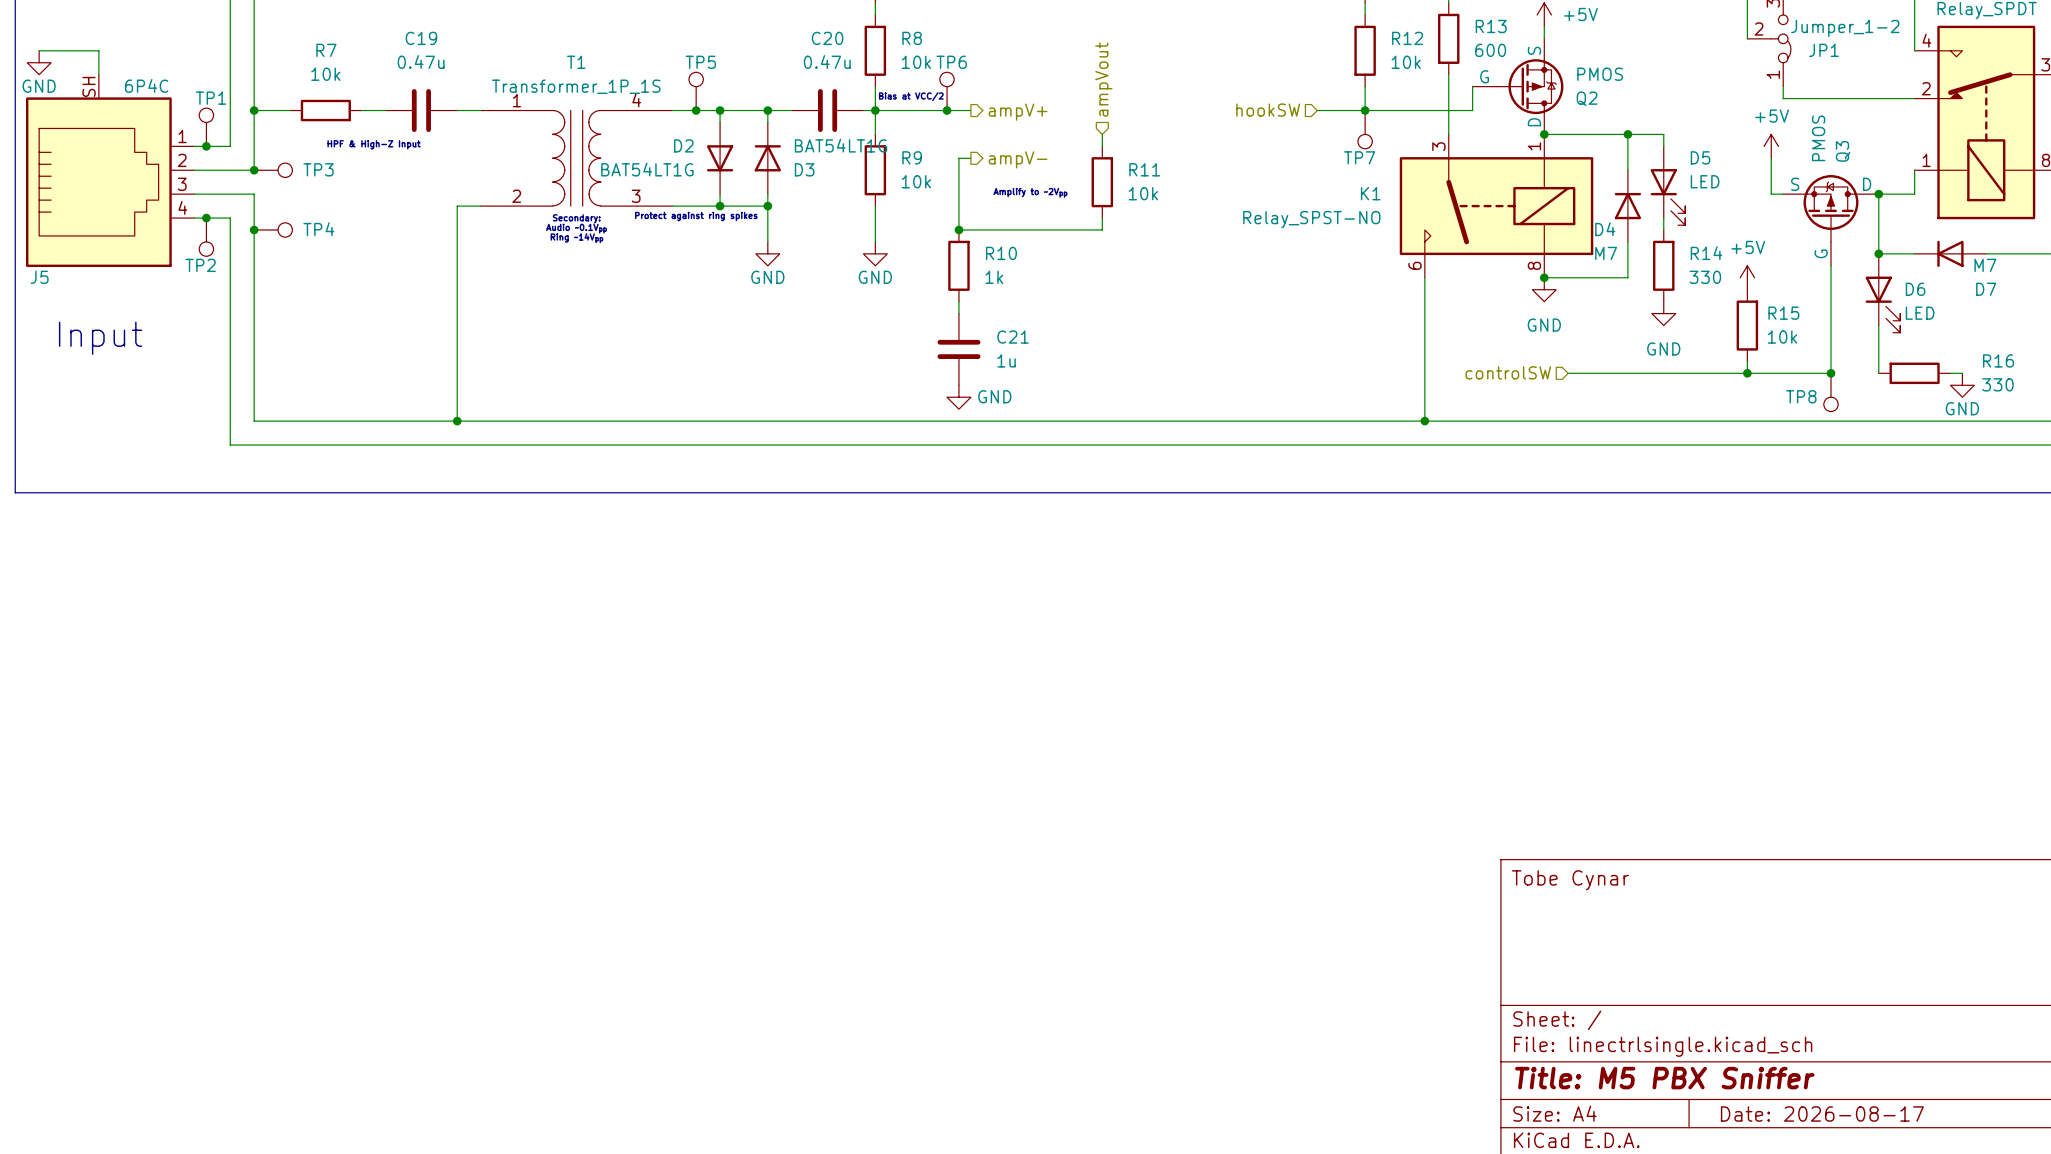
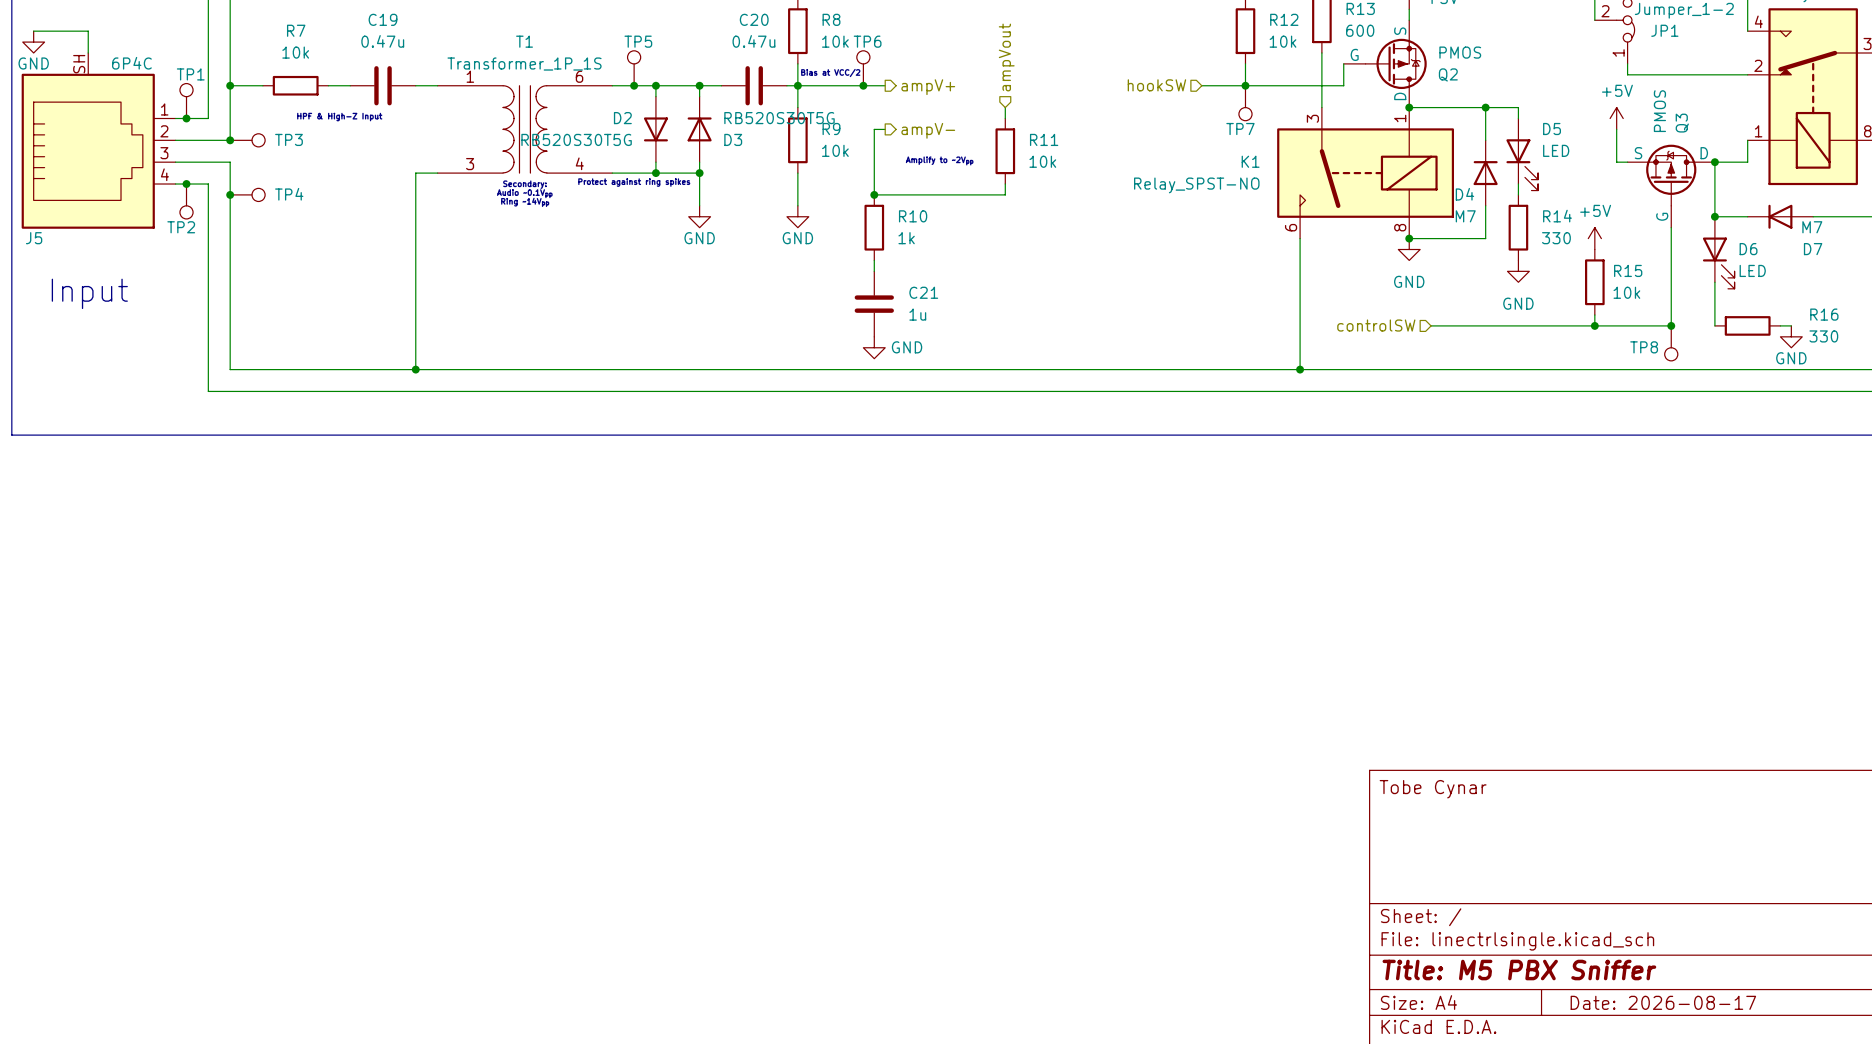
T1 pin number: 4 (636, 100) -> 6 (579, 76)
D3 value: BAT54LT1G (841, 145) -> RB520S30T5G (779, 118)
D2 value: BAT54LT1G (647, 169) -> RB520S30T5G (576, 139)
T1 pin number: 2 (516, 196) -> 3 (470, 164)
T1 pin number: 3 (636, 196) -> 4 (579, 163)

